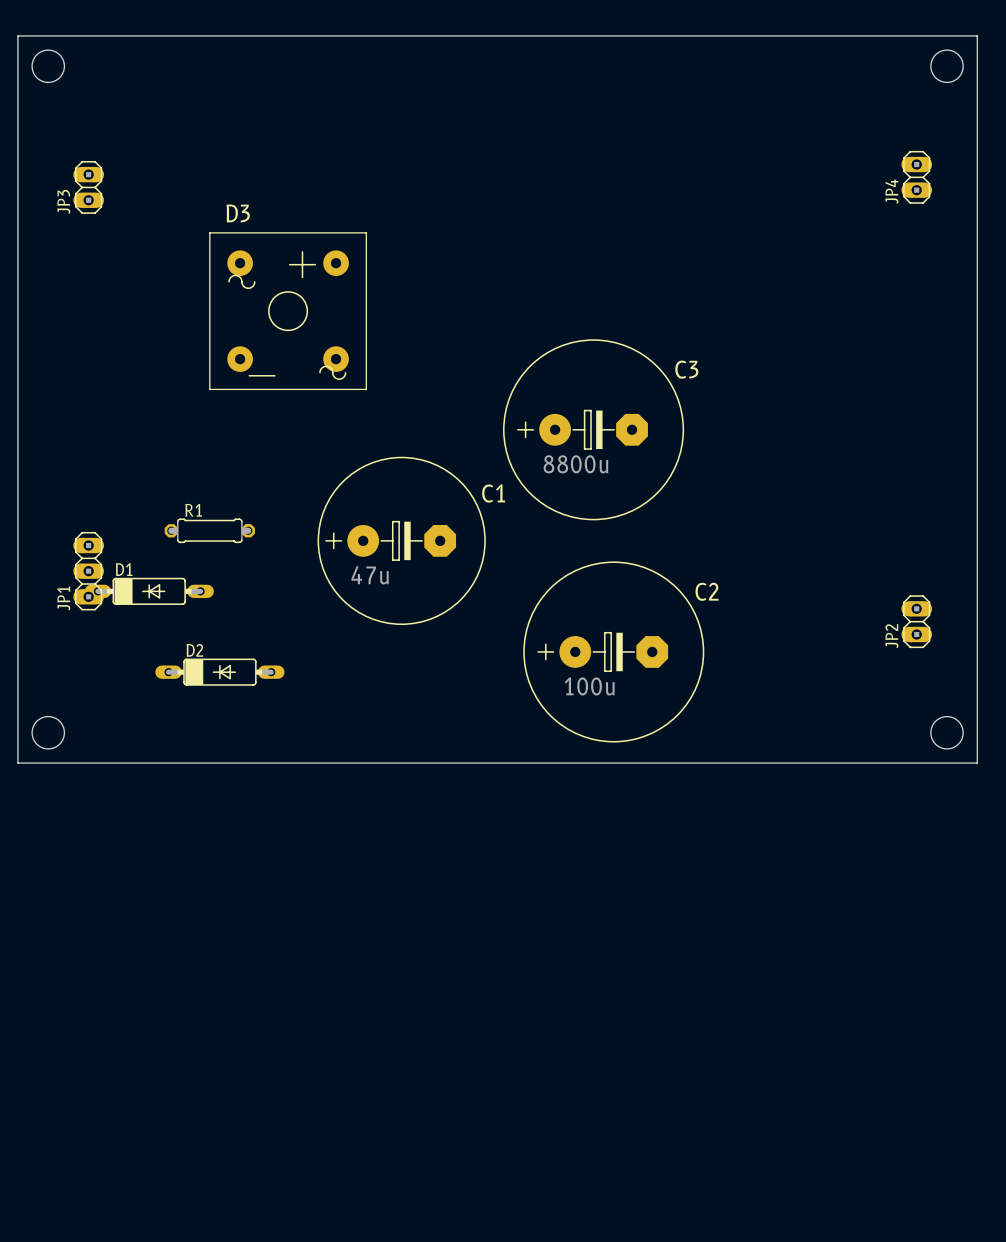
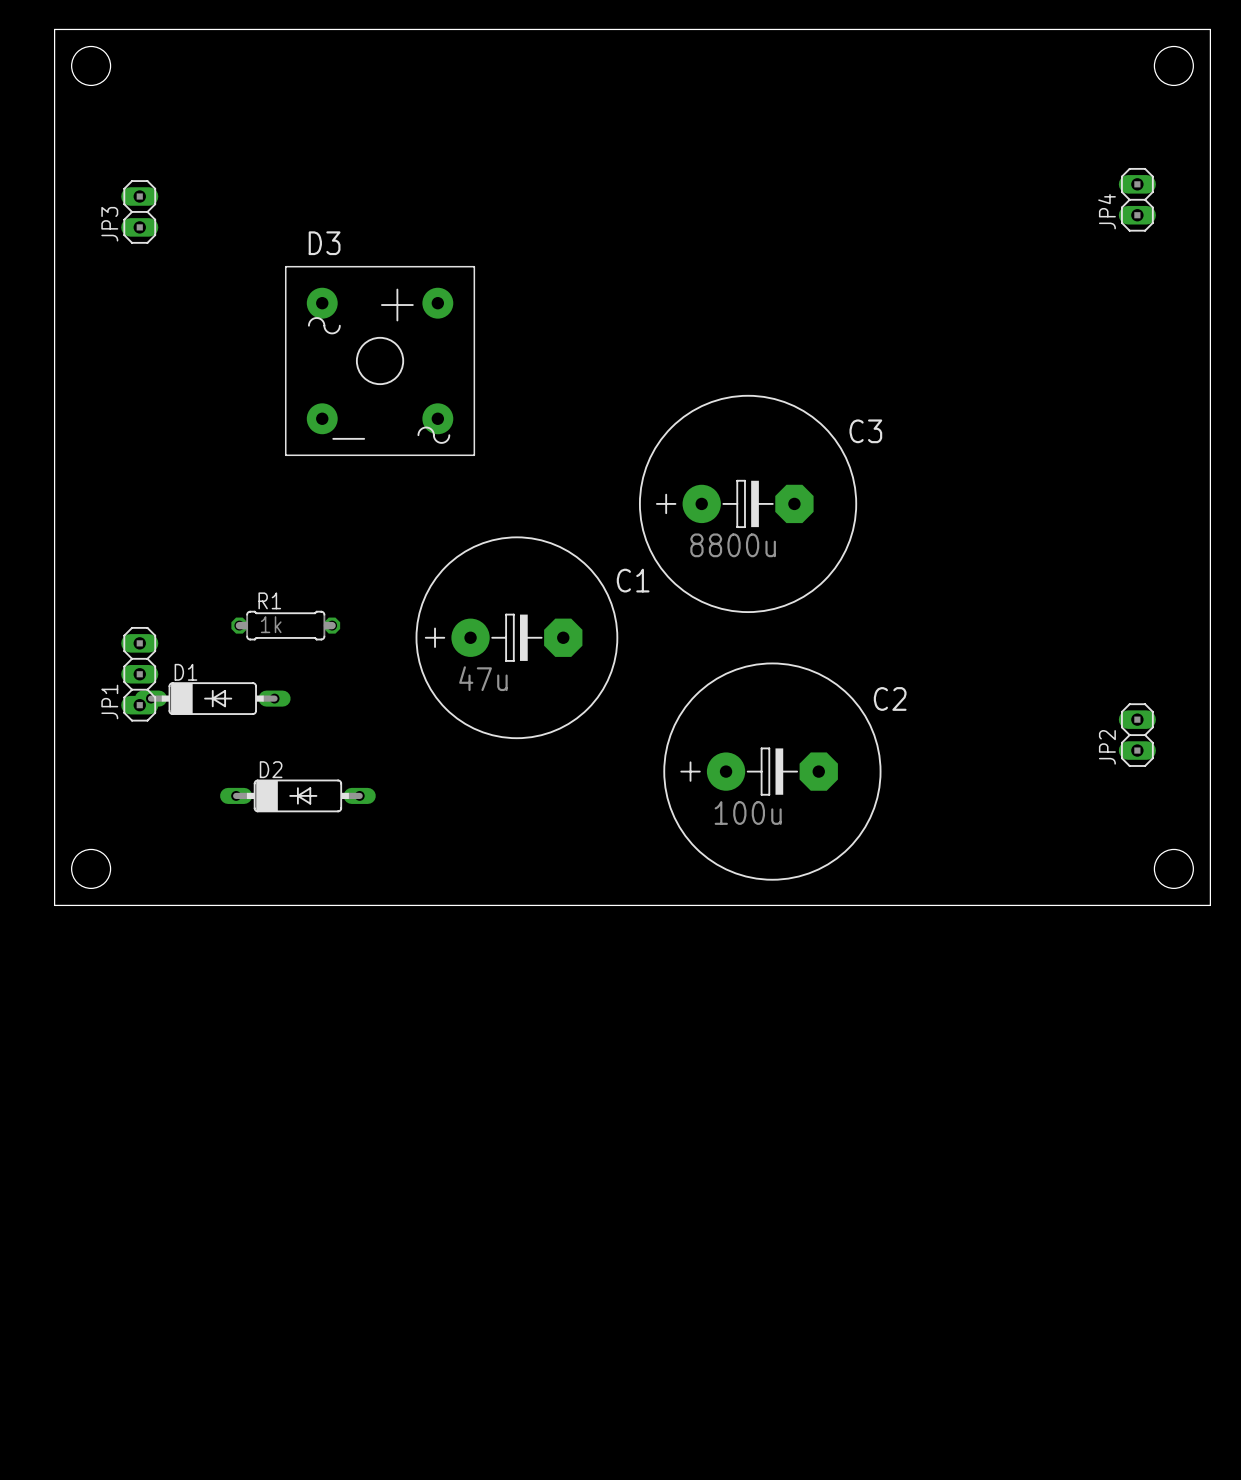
R1 value: none -> 1k (271, 624)

